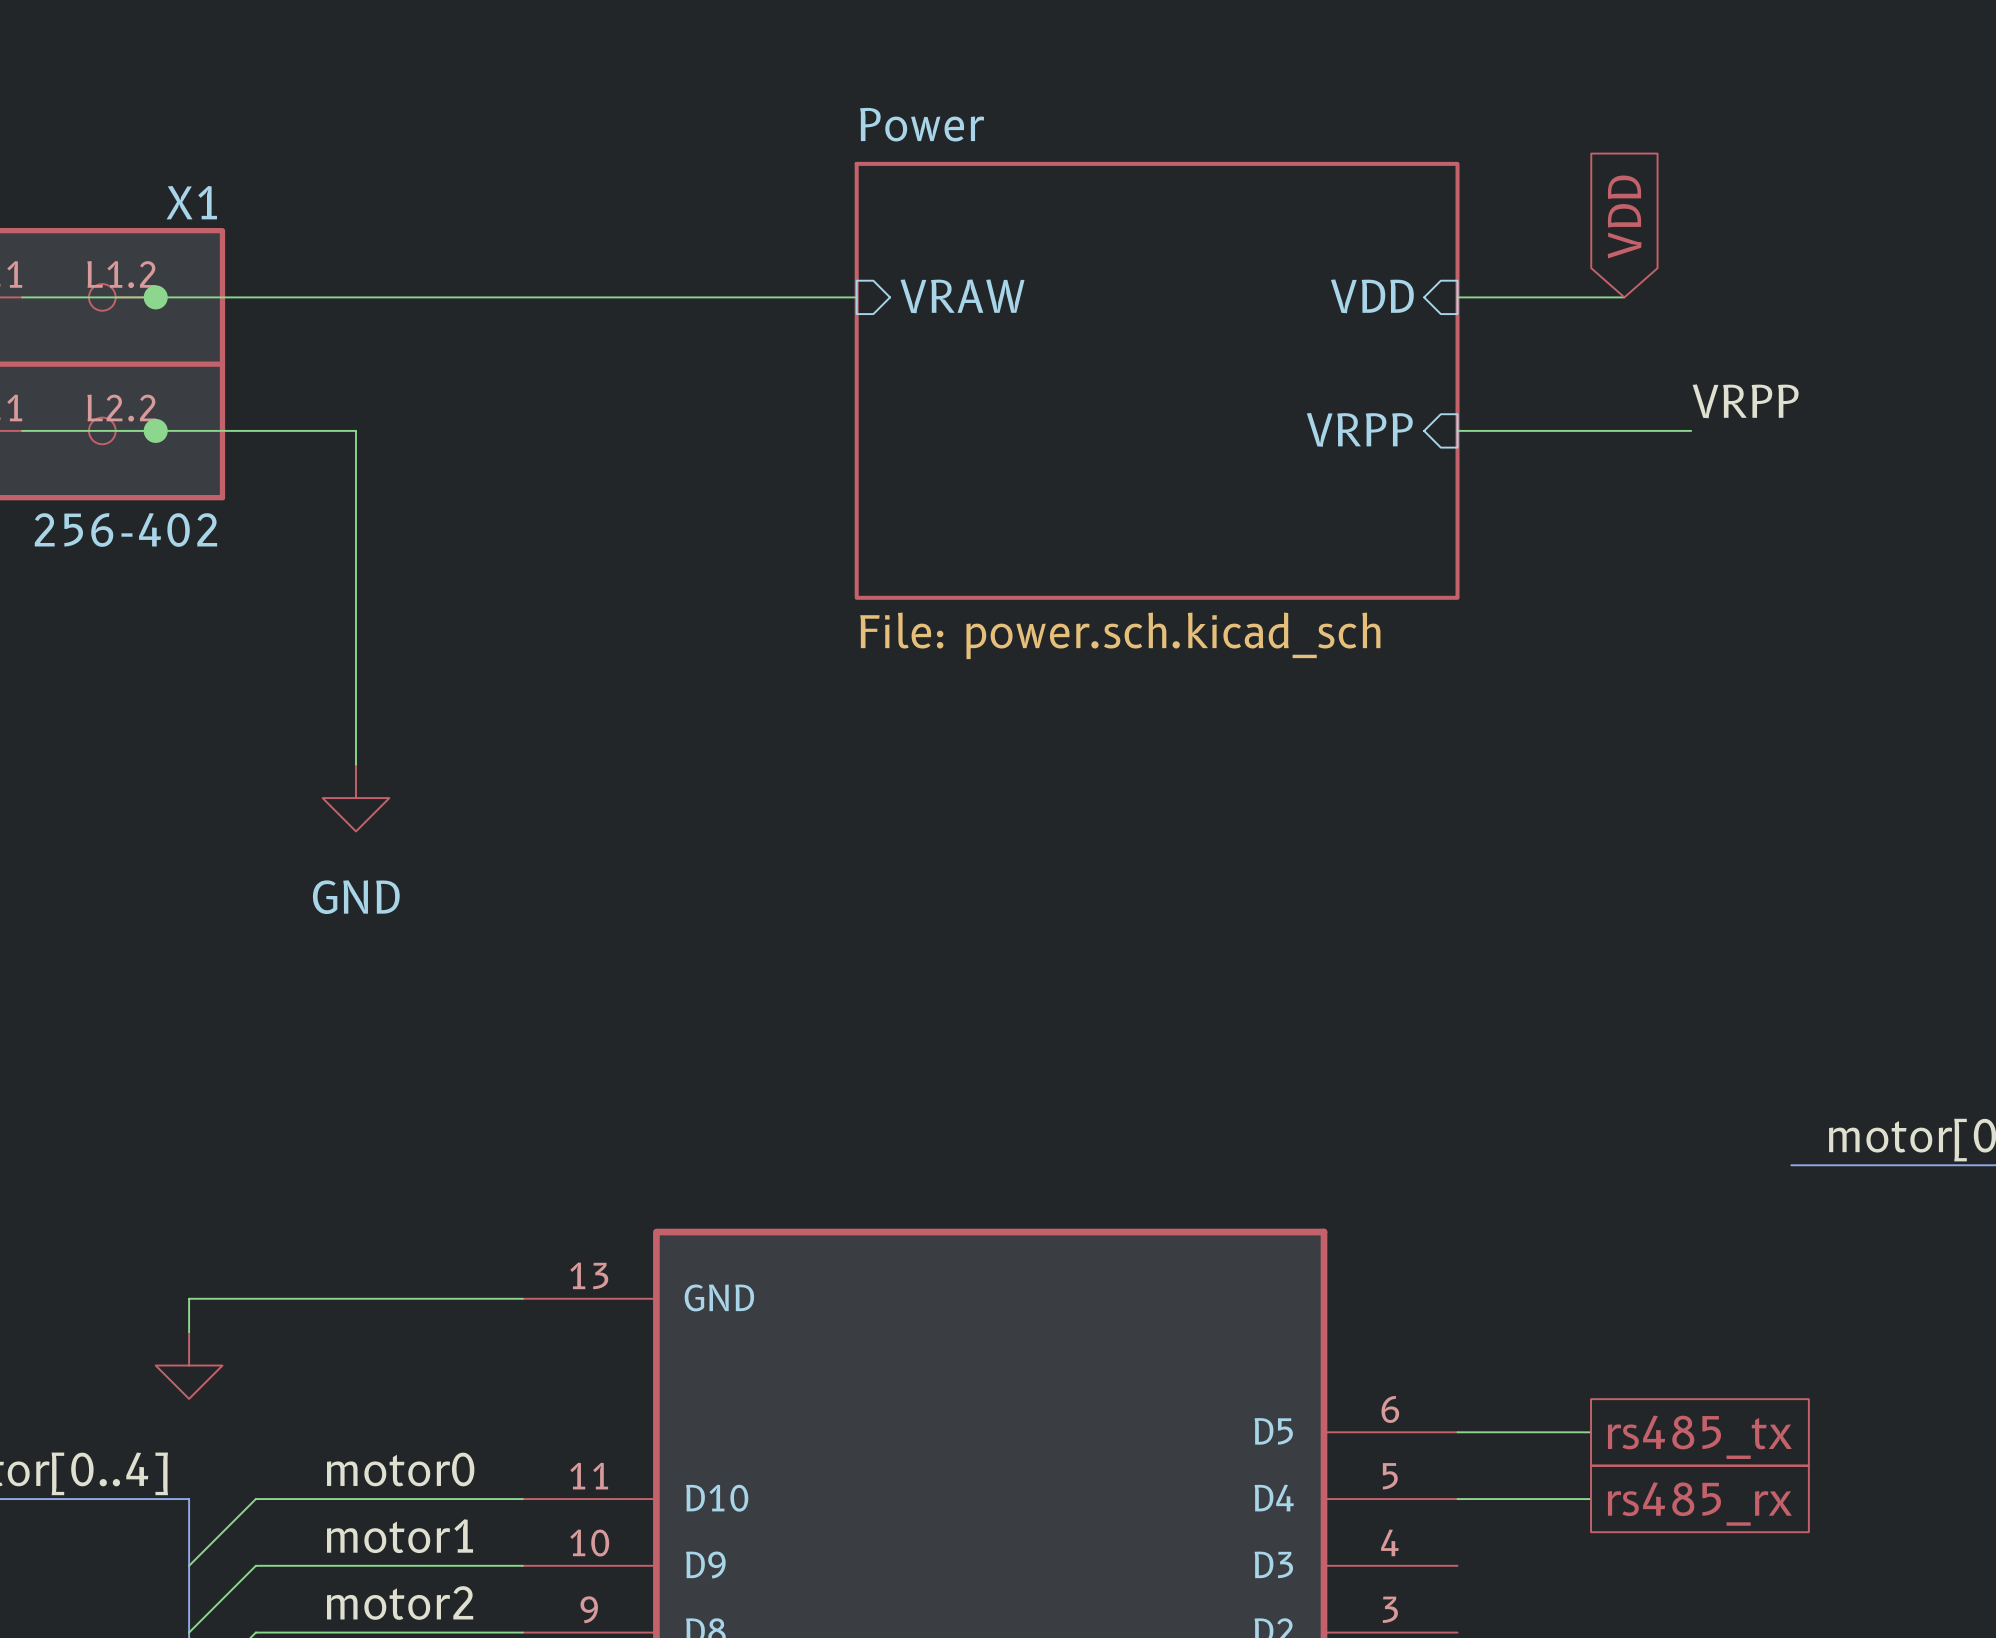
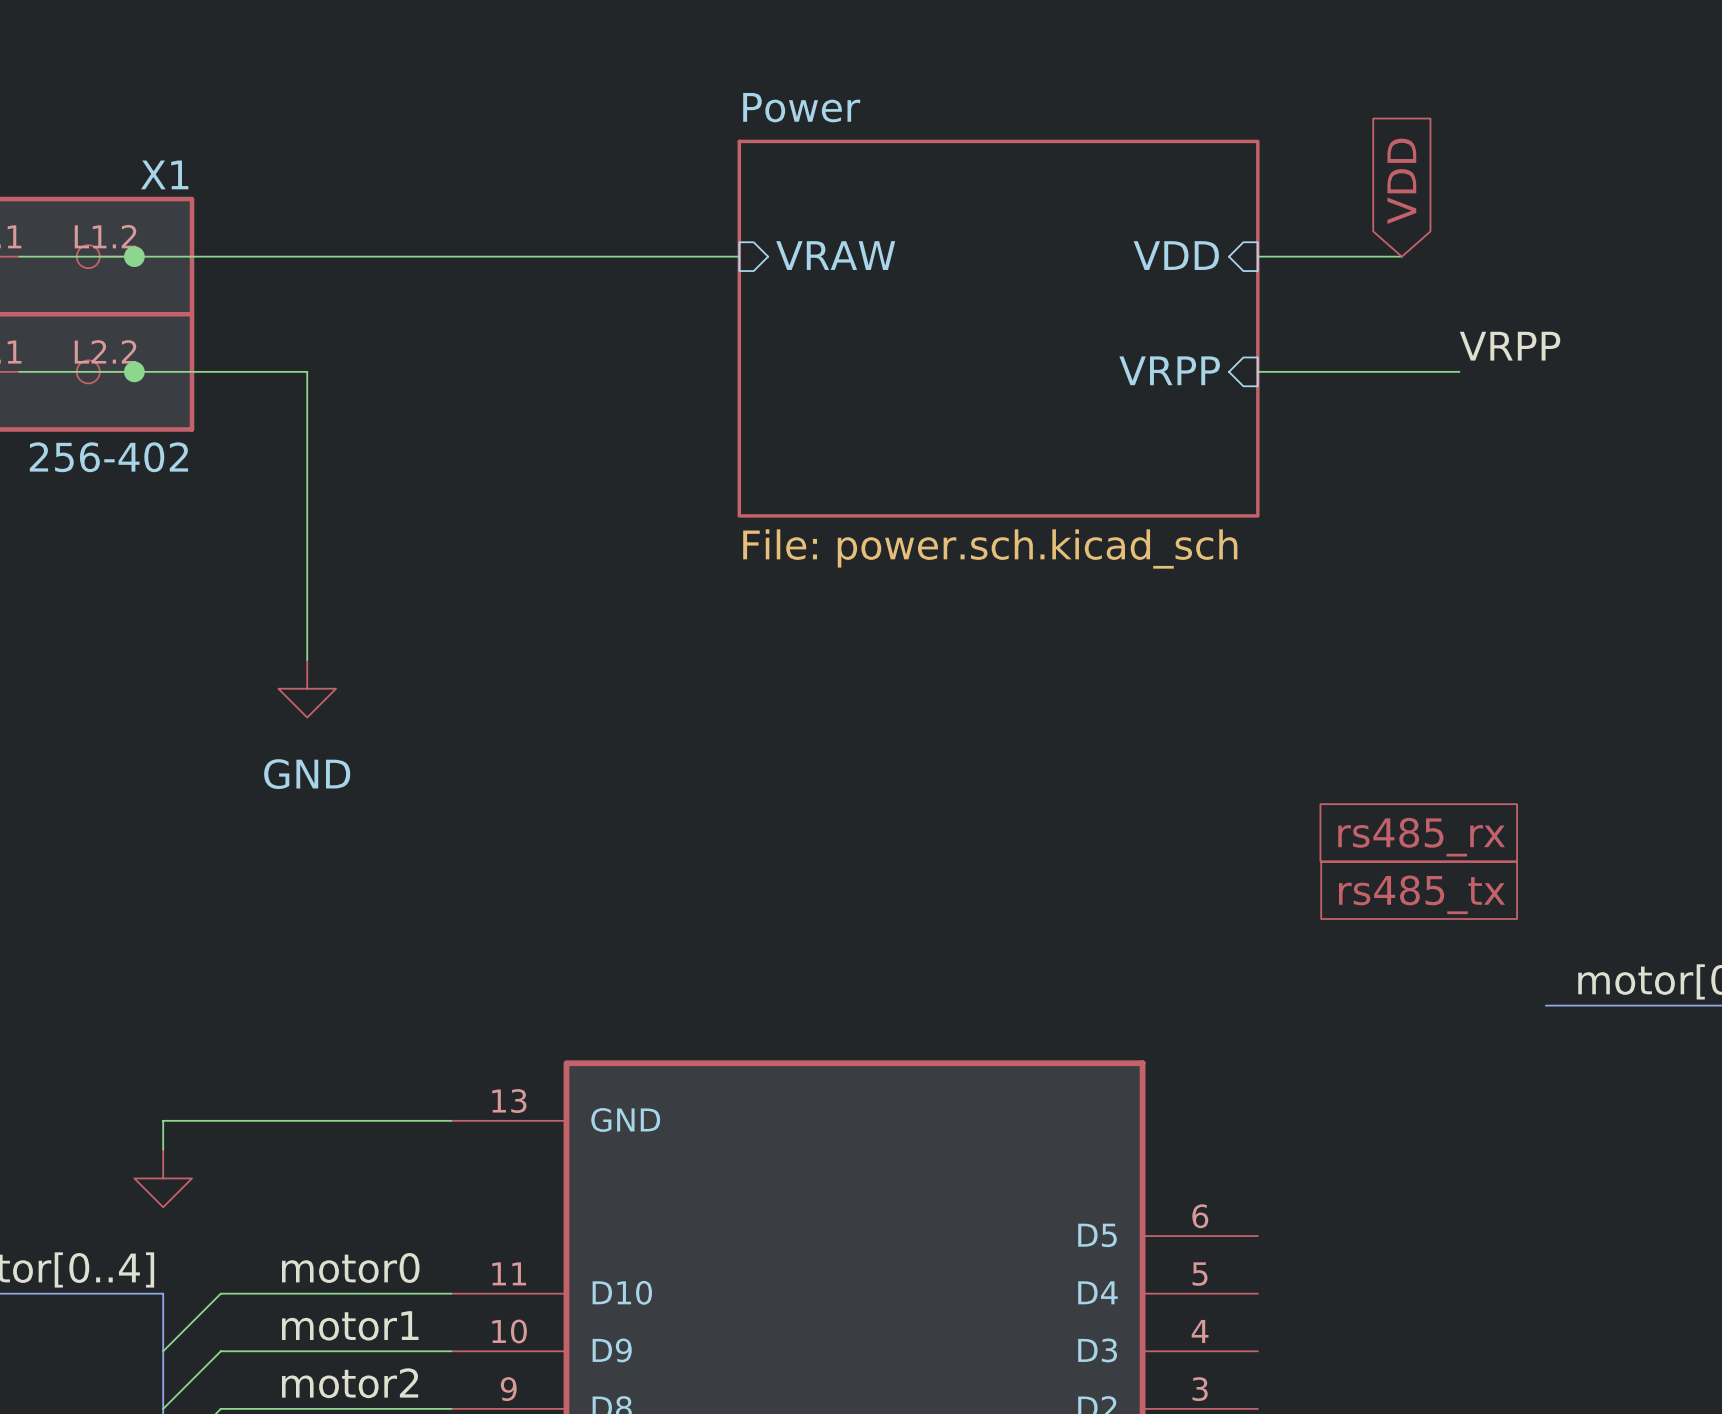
wire: (1457, 1432) (1591, 1432) -> none
global label rotation: 0° (1699, 1437) -> 180° (1421, 894)
global label position: rs485_tx (1699, 1437) -> rs485_tx (1421, 894)
wire: (1457, 1499) (1591, 1499) -> none
global label rotation: 0° (1699, 1504) -> 180° (1421, 837)
global label position: rs485_rx (1699, 1504) -> rs485_rx (1421, 837)

